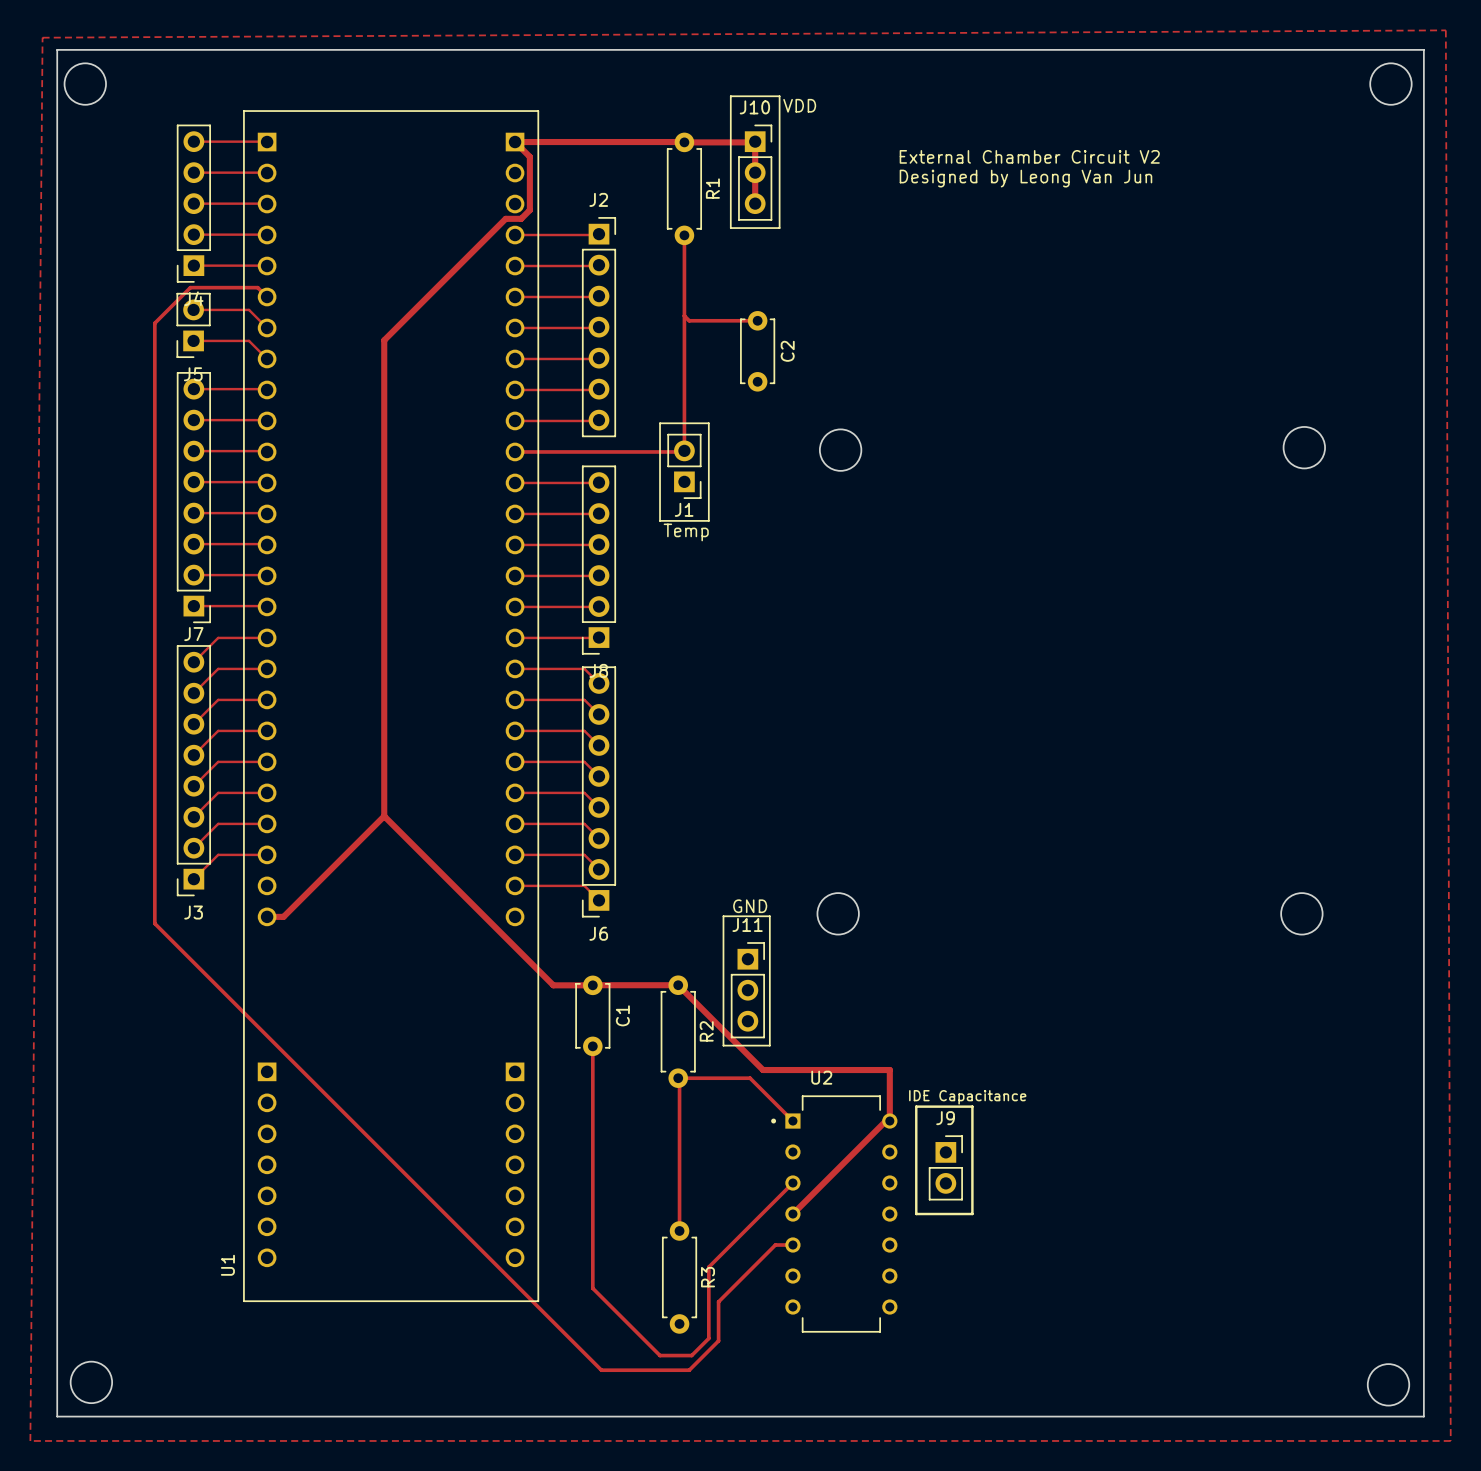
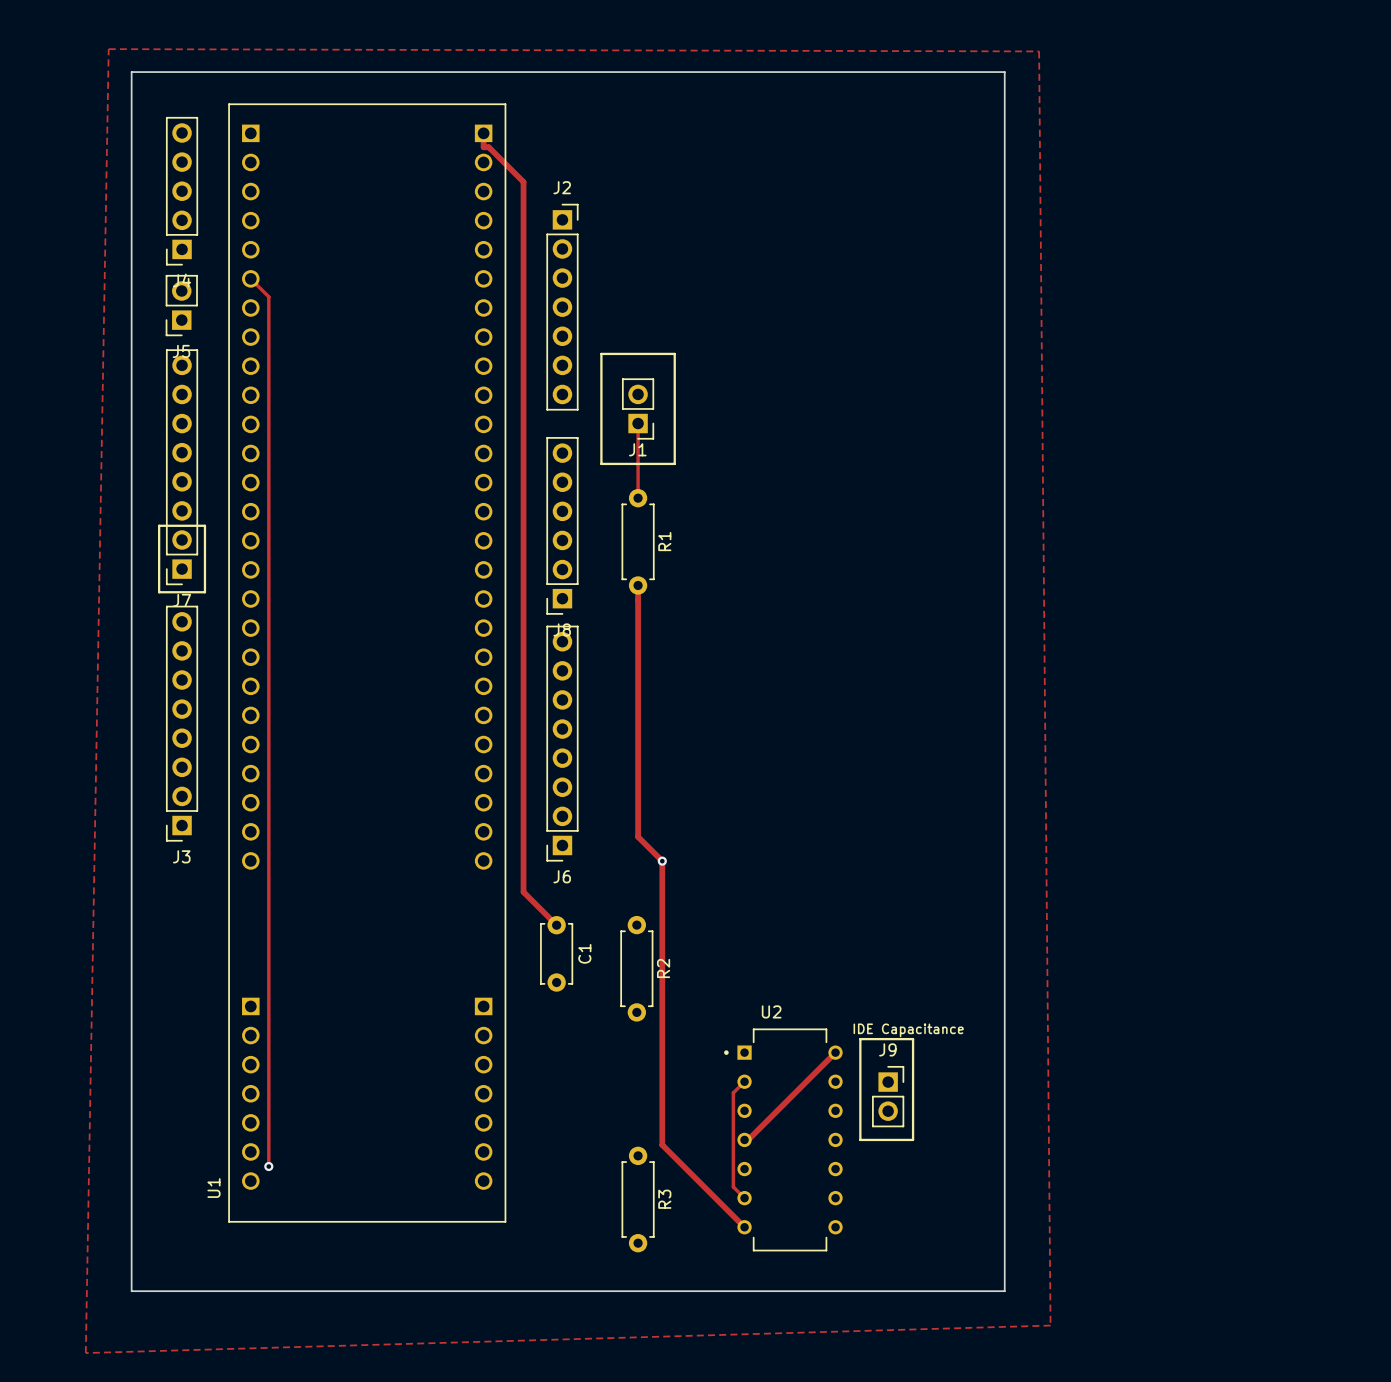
zone outline: (1445, 30) (42, 37) (30, 1440) (1450, 1440) (1445, 30) -> (108, 49) (85, 1353) (1050, 1325) (1039, 51) (108, 49)
board edge: (57, 49) (1423, 49) (1423, 1416) (57, 1416) (57, 49) -> (131, 72) (131, 1291) (1004, 1291) (1004, 72) (131, 72)
round board edge: [64, 63, 107, 106] -> none
round board edge: [1369, 63, 1413, 106] -> none
line: (730, 96) (779, 96) (779, 228) (730, 228) (730, 96) -> none
text: VDD (799, 105) -> none
track: (193, 141) (267, 142) -> none
text: External Chamber Circuit V2 (1029, 156) -> none
track: (193, 172) (267, 173) -> none
J10: (755, 172) -> none
text: Designed by Leong Van Jun (1025, 178) -> none
R1 position: (684, 188) -> (638, 541)
track: (193, 203) (267, 204) -> none
track: (755, 203) (755, 141) (515, 142) (529, 156) (529, 210) (521, 218) (505, 218) (384, 340) (384, 816) -> none
track: (193, 234) (267, 235) -> none
track: (599, 234) (515, 235) -> none
track: (684, 235) (684, 450) (515, 451) -> none
track: (193, 265) (267, 266) -> none
track: (599, 265) (515, 266) -> none
track: (267, 296) (257, 287) (190, 287) (154, 323) (154, 923) (601, 1370) (689, 1370) (718, 1340) (718, 1301) (775, 1245) (792, 1245) -> (250, 278) (268, 296) (268, 1166)
track: (599, 296) (515, 296) -> none
track: (193, 309) (249, 309) (267, 327) -> none
track: (684, 315) (689, 320) (757, 320) -> none
track: (599, 327) (515, 327) -> none
track: (193, 340) (249, 340) (267, 358) -> none
C2: (757, 351) -> none
track: (599, 358) (515, 358) -> none
J7 footprint: [176, 372, 211, 624] -> [166, 349, 198, 586]
line: none -> (601, 353) (674, 353) (674, 463) (601, 463) (601, 353)
track: (193, 389) (267, 389) -> none
track: (599, 389) (515, 389) -> none
track: (193, 420) (267, 420) -> none
track: (599, 420) (515, 420) -> none
line: (660, 423) (708, 423) (708, 520) (660, 520) (660, 423) -> none
round board edge: [1283, 426, 1326, 469] -> none
round board edge: [819, 429, 862, 472] -> none
track: (193, 451) (267, 451) -> none
track: none -> (638, 423) (638, 498)
J1 position: (684, 466) -> (638, 408)
track: (193, 482) (267, 482) -> none
track: (599, 482) (515, 482) -> none
track: (193, 513) (267, 513) -> none
track: (599, 513) (515, 513) -> none
text: Temp (686, 532) -> none
track: (193, 544) (267, 544) -> none
track: (599, 544) (515, 544) -> none
line: none -> (159, 525) (204, 525) (204, 592) (159, 592) (159, 525)
track: (193, 575) (267, 575) -> none
track: (599, 575) (515, 575) -> none
track: (193, 606) (267, 606) -> none
track: (599, 606) (515, 606) -> none
track: none -> (638, 585) (638, 836) (662, 861) (662, 1145) (744, 1227)
track: (267, 637) (218, 637) (193, 662) -> none
track: (599, 637) (515, 637) -> none
track: (267, 668) (218, 668) (193, 693) -> none
track: (515, 668) (584, 668) (599, 683) -> none
track: (267, 699) (218, 699) (193, 724) -> none
track: (515, 699) (584, 699) (599, 714) -> none
track: (267, 730) (218, 730) (193, 755) -> none
track: (515, 730) (584, 730) (599, 745) -> none
track: (267, 761) (218, 761) (193, 786) -> none
track: (515, 761) (584, 761) (599, 776) -> none
track: (267, 792) (218, 792) (193, 817) -> none
track: (515, 792) (584, 792) (599, 807) -> none
track: (384, 816) (553, 985) (592, 985) -> (483, 133) (483, 147) (488, 147) (523, 181) (523, 892) (556, 925)
track: (384, 816) (283, 916) (267, 916) -> none
track: (267, 823) (218, 823) (193, 848) -> none
track: (515, 823) (584, 823) (599, 838) -> none
track: (267, 854) (218, 854) (193, 879) -> none
track: (515, 854) (584, 854) (599, 869) -> none
track: (515, 885) (584, 885) (599, 900) -> none
round board edge: [817, 892, 860, 935] -> none
round board edge: [1280, 892, 1323, 935] -> none
text: GND (750, 906) -> none
line: (723, 916) (769, 916) (769, 1045) (723, 1045) (723, 916) -> none
via: none -> (662, 861)
track: (592, 985) (678, 985) (763, 1070) (889, 1070) (889, 1121) (885, 1121) (792, 1214) -> (835, 1052) (748, 1139) (744, 1139)
J11: (747, 990) -> none
track: (592, 1046) (592, 1288) (660, 1355) (691, 1355) (708, 1338) (708, 1267) (792, 1183) -> none
track: (792, 1121) (750, 1078) (678, 1078) (679, 1230) -> none
track: none -> (744, 1081) (733, 1092) (733, 1186) (744, 1198)
via: none -> (268, 1166)
round board edge: [70, 1361, 113, 1404] -> none
round board edge: [1367, 1363, 1410, 1406] -> none

